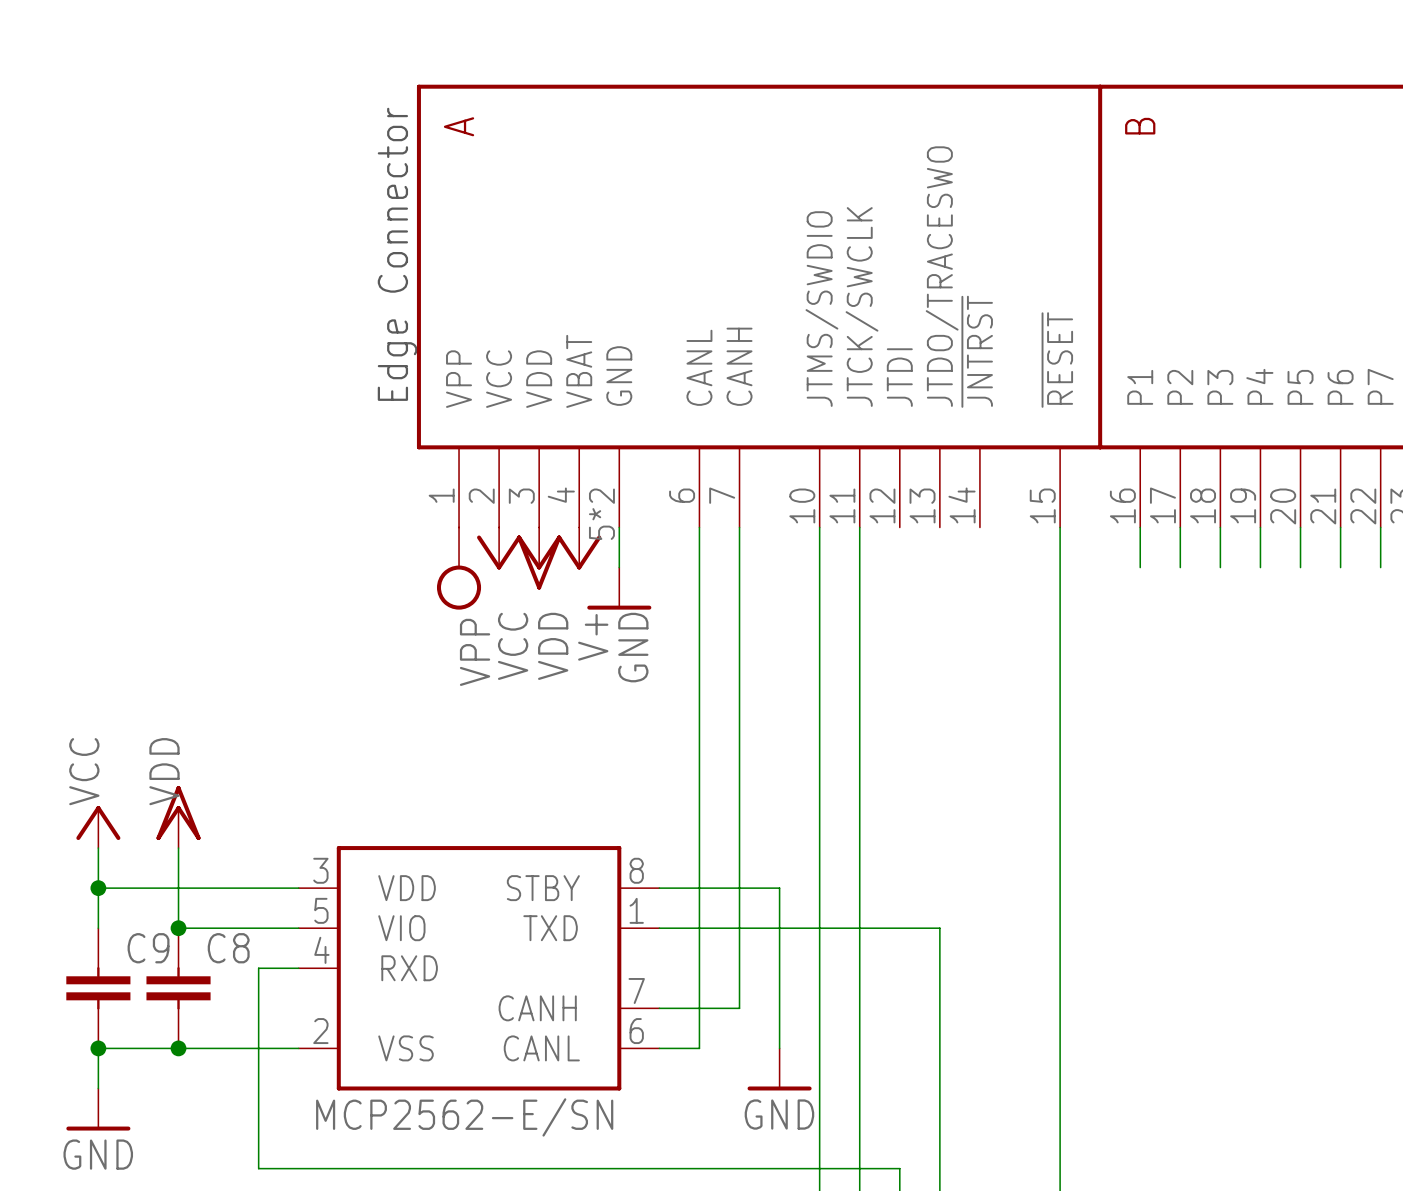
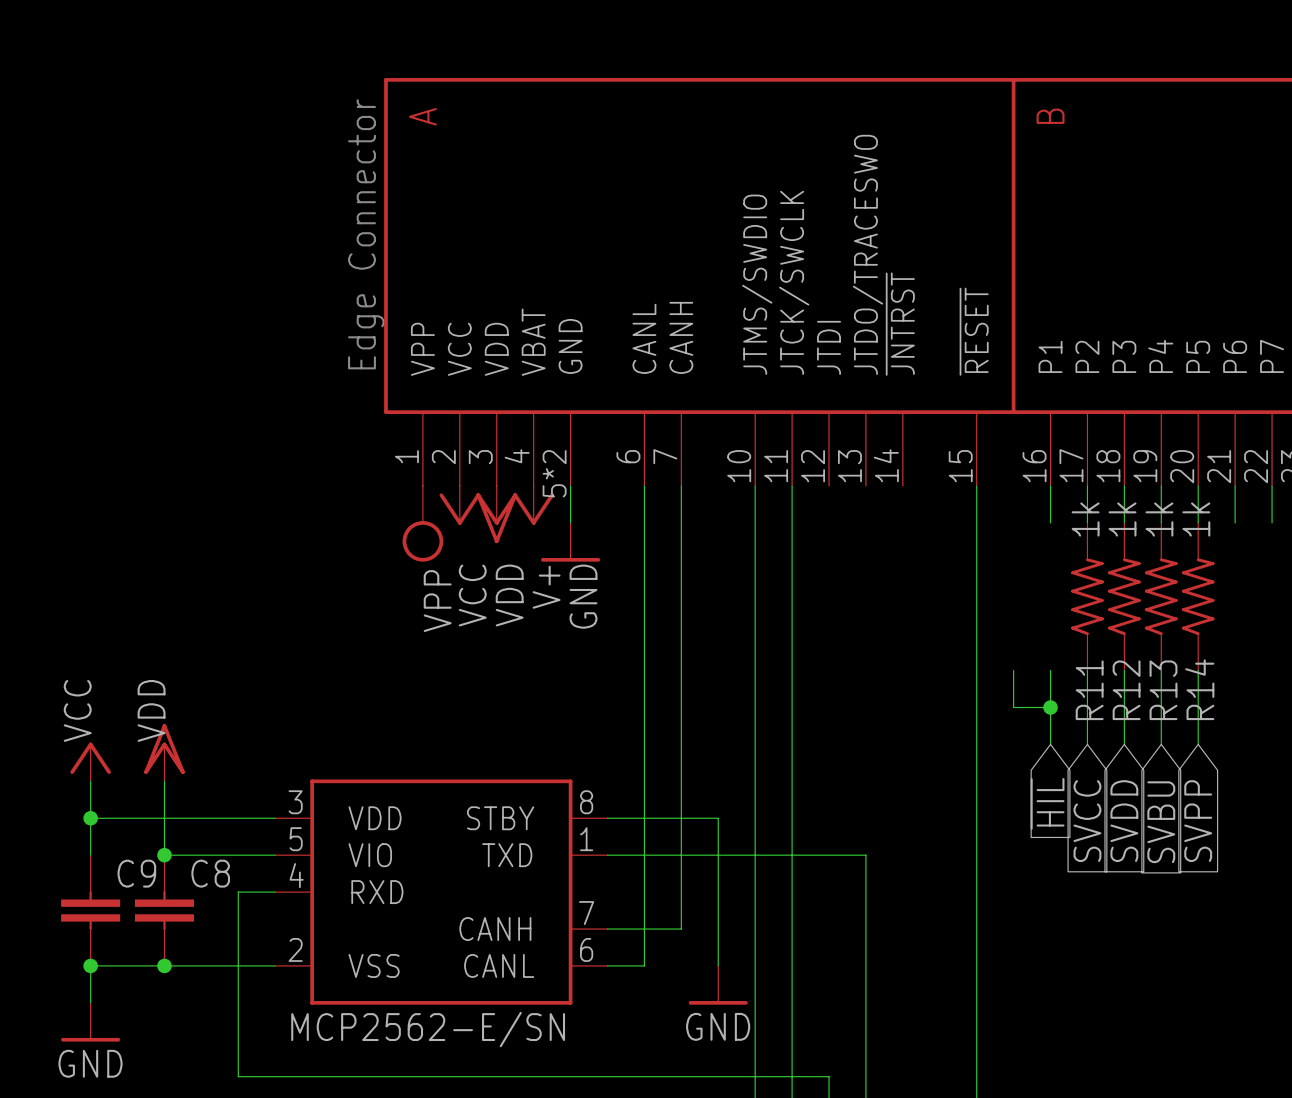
R11: none -> 1k (1087, 596)
R12: none -> 1k (1124, 596)
R13: none -> 1k (1161, 596)
R14: none -> 1k (1198, 596)
wire: none -> (1013, 670) (1013, 707) (1050, 707)
wire: none -> (1050, 670) (1050, 744)
wire: none -> (1087, 670) (1087, 744)
wire: none -> (1124, 670) (1124, 744)
wire: none -> (1161, 670) (1161, 744)
wire: none -> (1198, 670) (1198, 744)
junction: none -> (1050, 707)
global label: none -> ~{HIL} (1047, 803)
global label: none -> SVCC (1087, 821)
global label: none -> SVDD (1124, 821)
global label: none -> SVPP (1198, 821)
global label: none -> SVBU (1161, 822)

